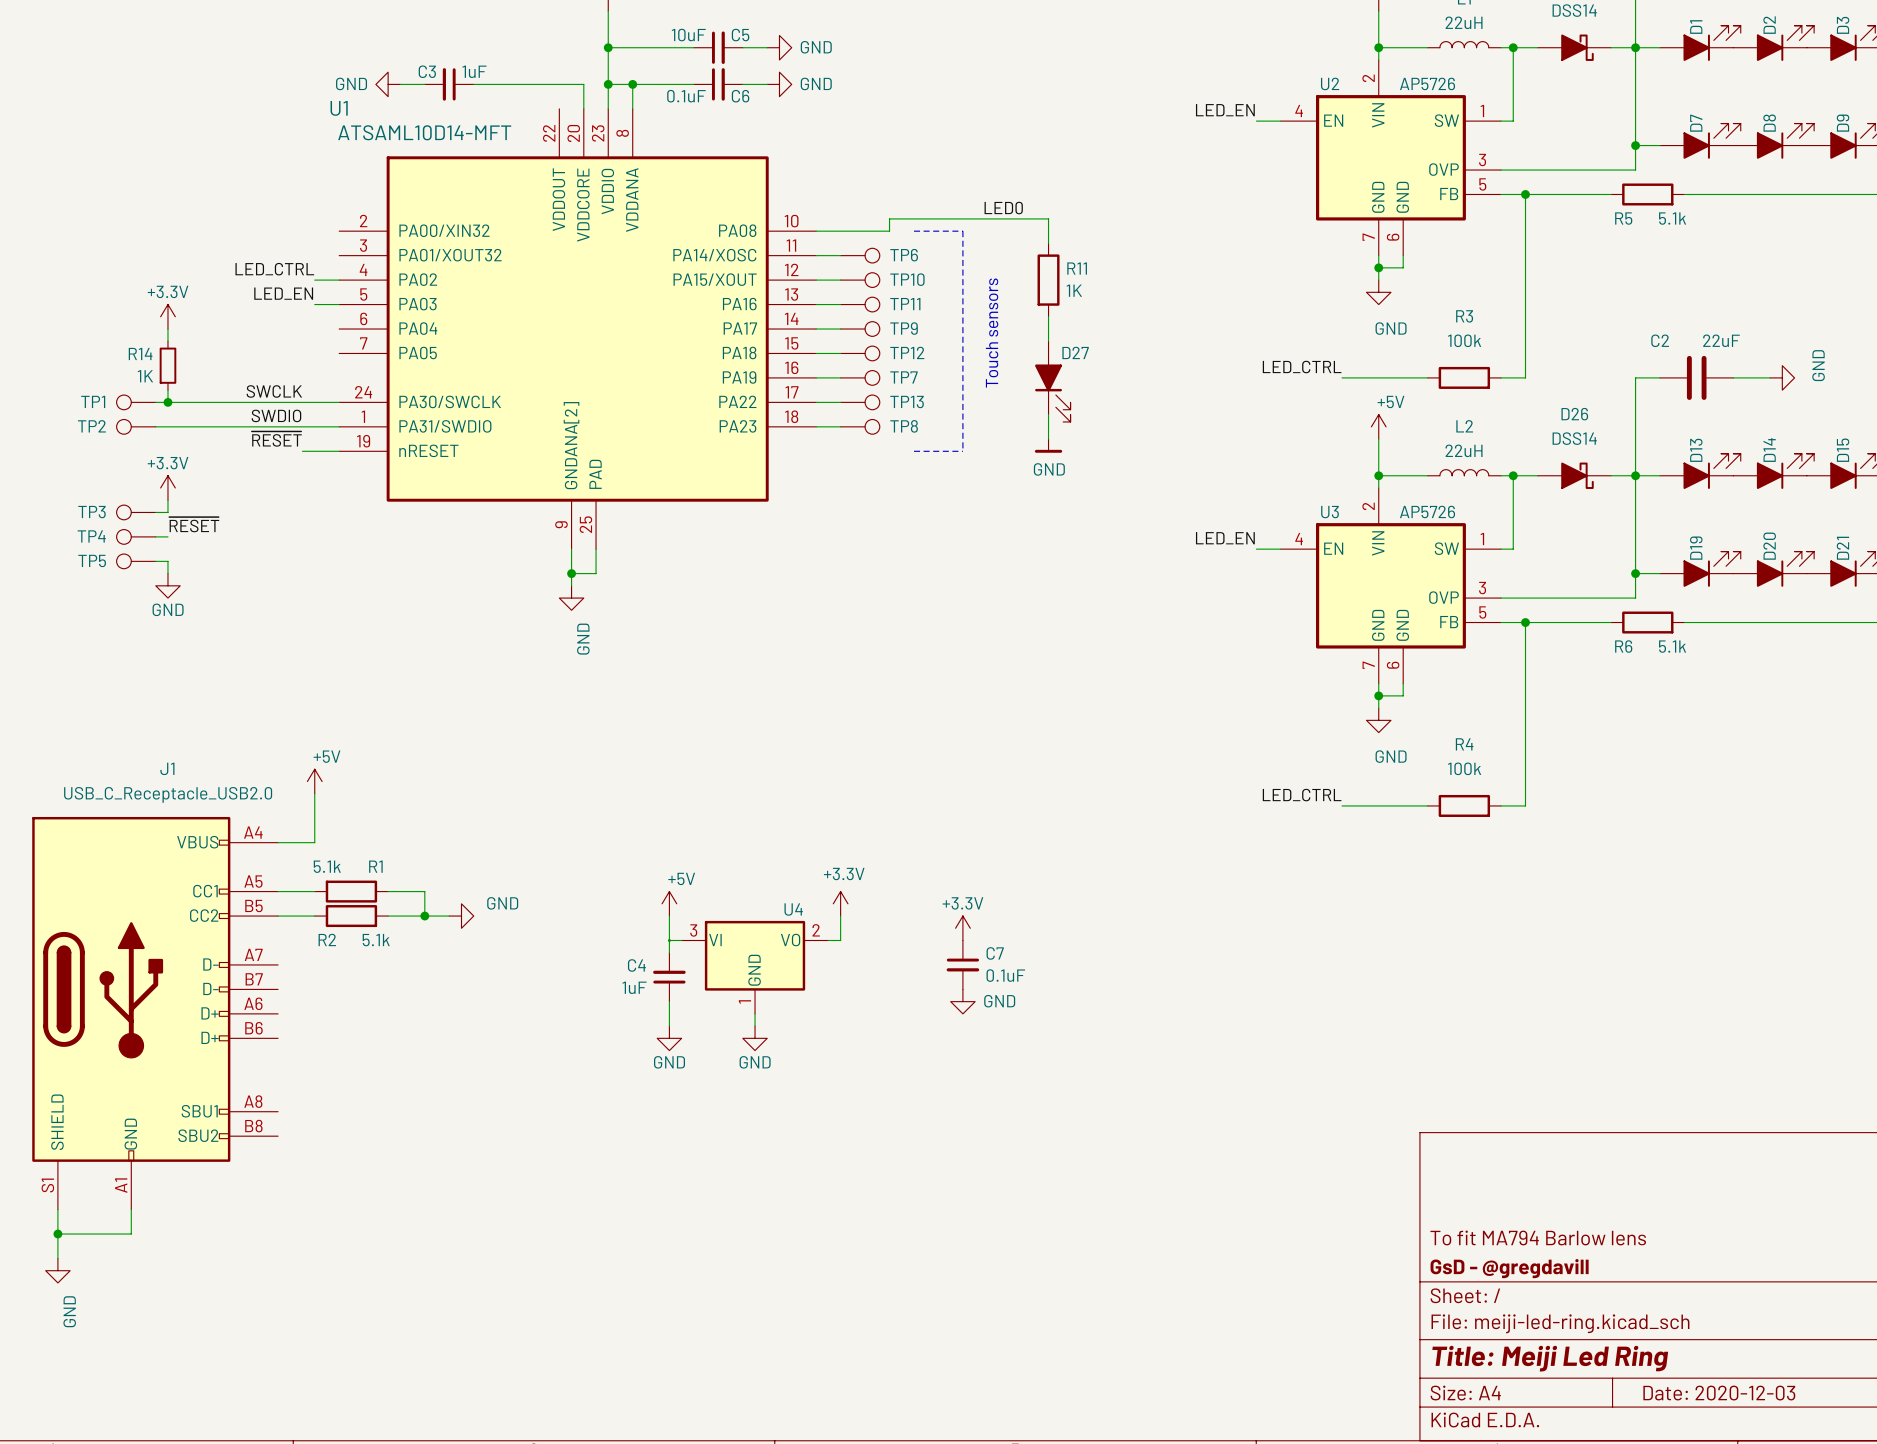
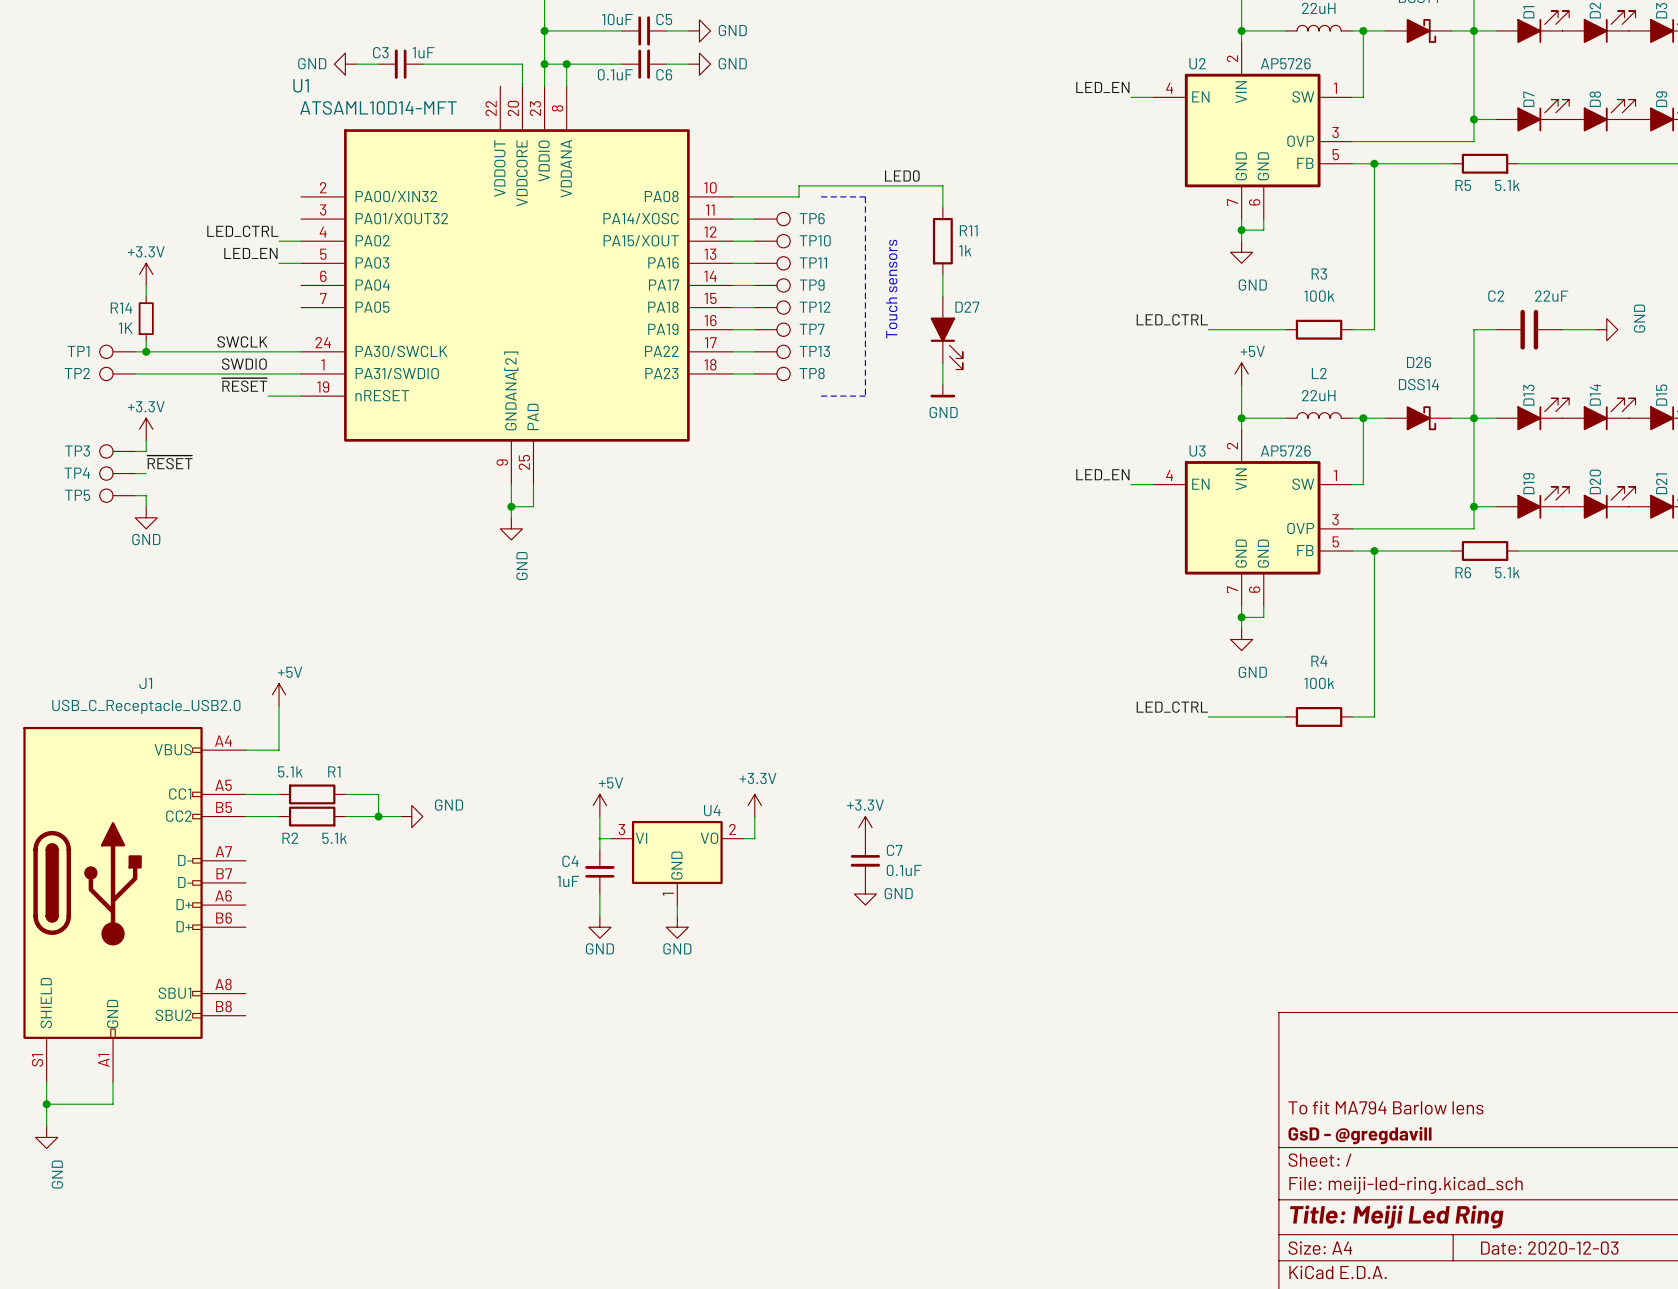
R11 value: 1K (1074, 290) -> 1k (965, 250)

